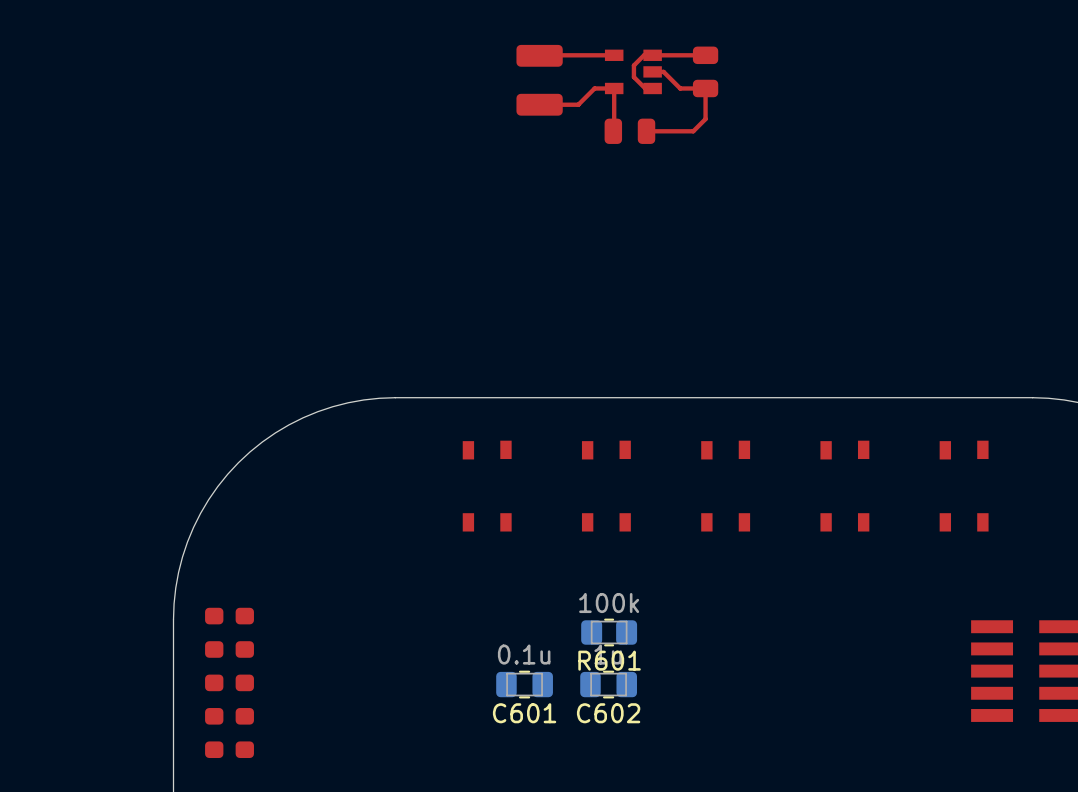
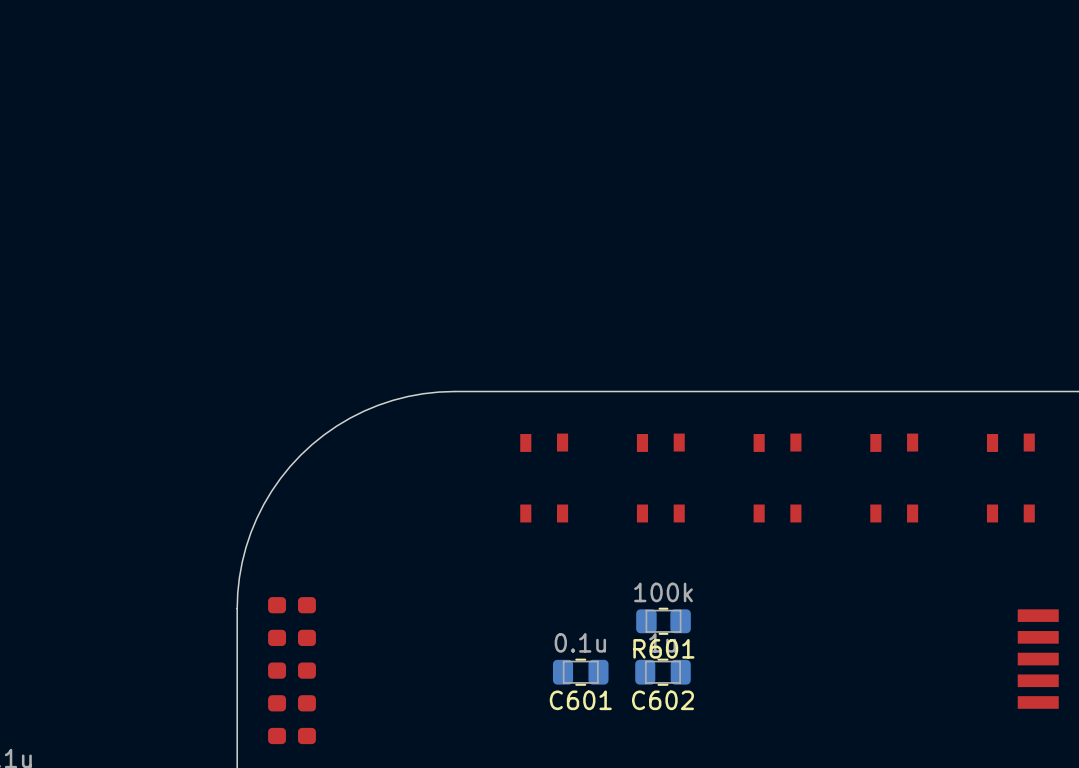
top track: (614, 55) (539, 55) -> none
top track: (705, 55) (644, 55) (633, 65) (633, 77) (645, 88) (652, 88) -> none
part: (633, 71) -> none
top track: (652, 71) (663, 71) (680, 88) (705, 88) (705, 119) (693, 131) (646, 131) -> none
part: (705, 71) -> none
part: (539, 80) -> none
top track: (539, 104) (578, 104) (594, 88) (614, 88) (613, 131) -> none
part: (629, 131) -> none

